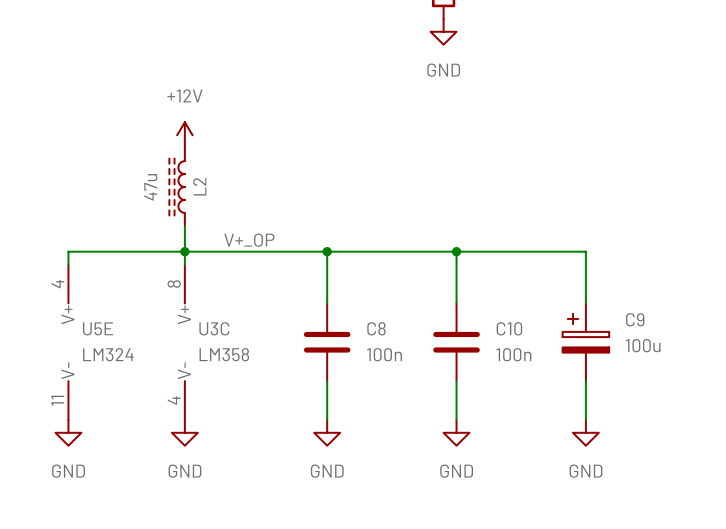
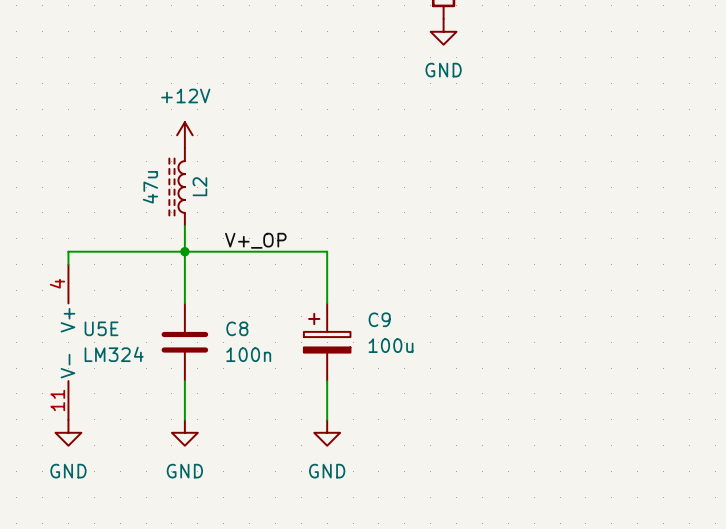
wire: (327, 251) (585, 251) (585, 303) -> none
junction: (327, 251) -> none
wire: (456, 251) (456, 303) -> none
junction: (456, 251) -> none
U3C: LM358 (184, 342) -> none
C8 position: (327, 342) -> (184, 342)
C10: 100n (456, 342) -> none
C9 position: (585, 342) -> (327, 342)
wire: (456, 381) (456, 419) -> none
wire: (585, 381) (585, 419) -> none
power symbol: GND (456, 432) -> none
power symbol: GND (585, 432) -> none

